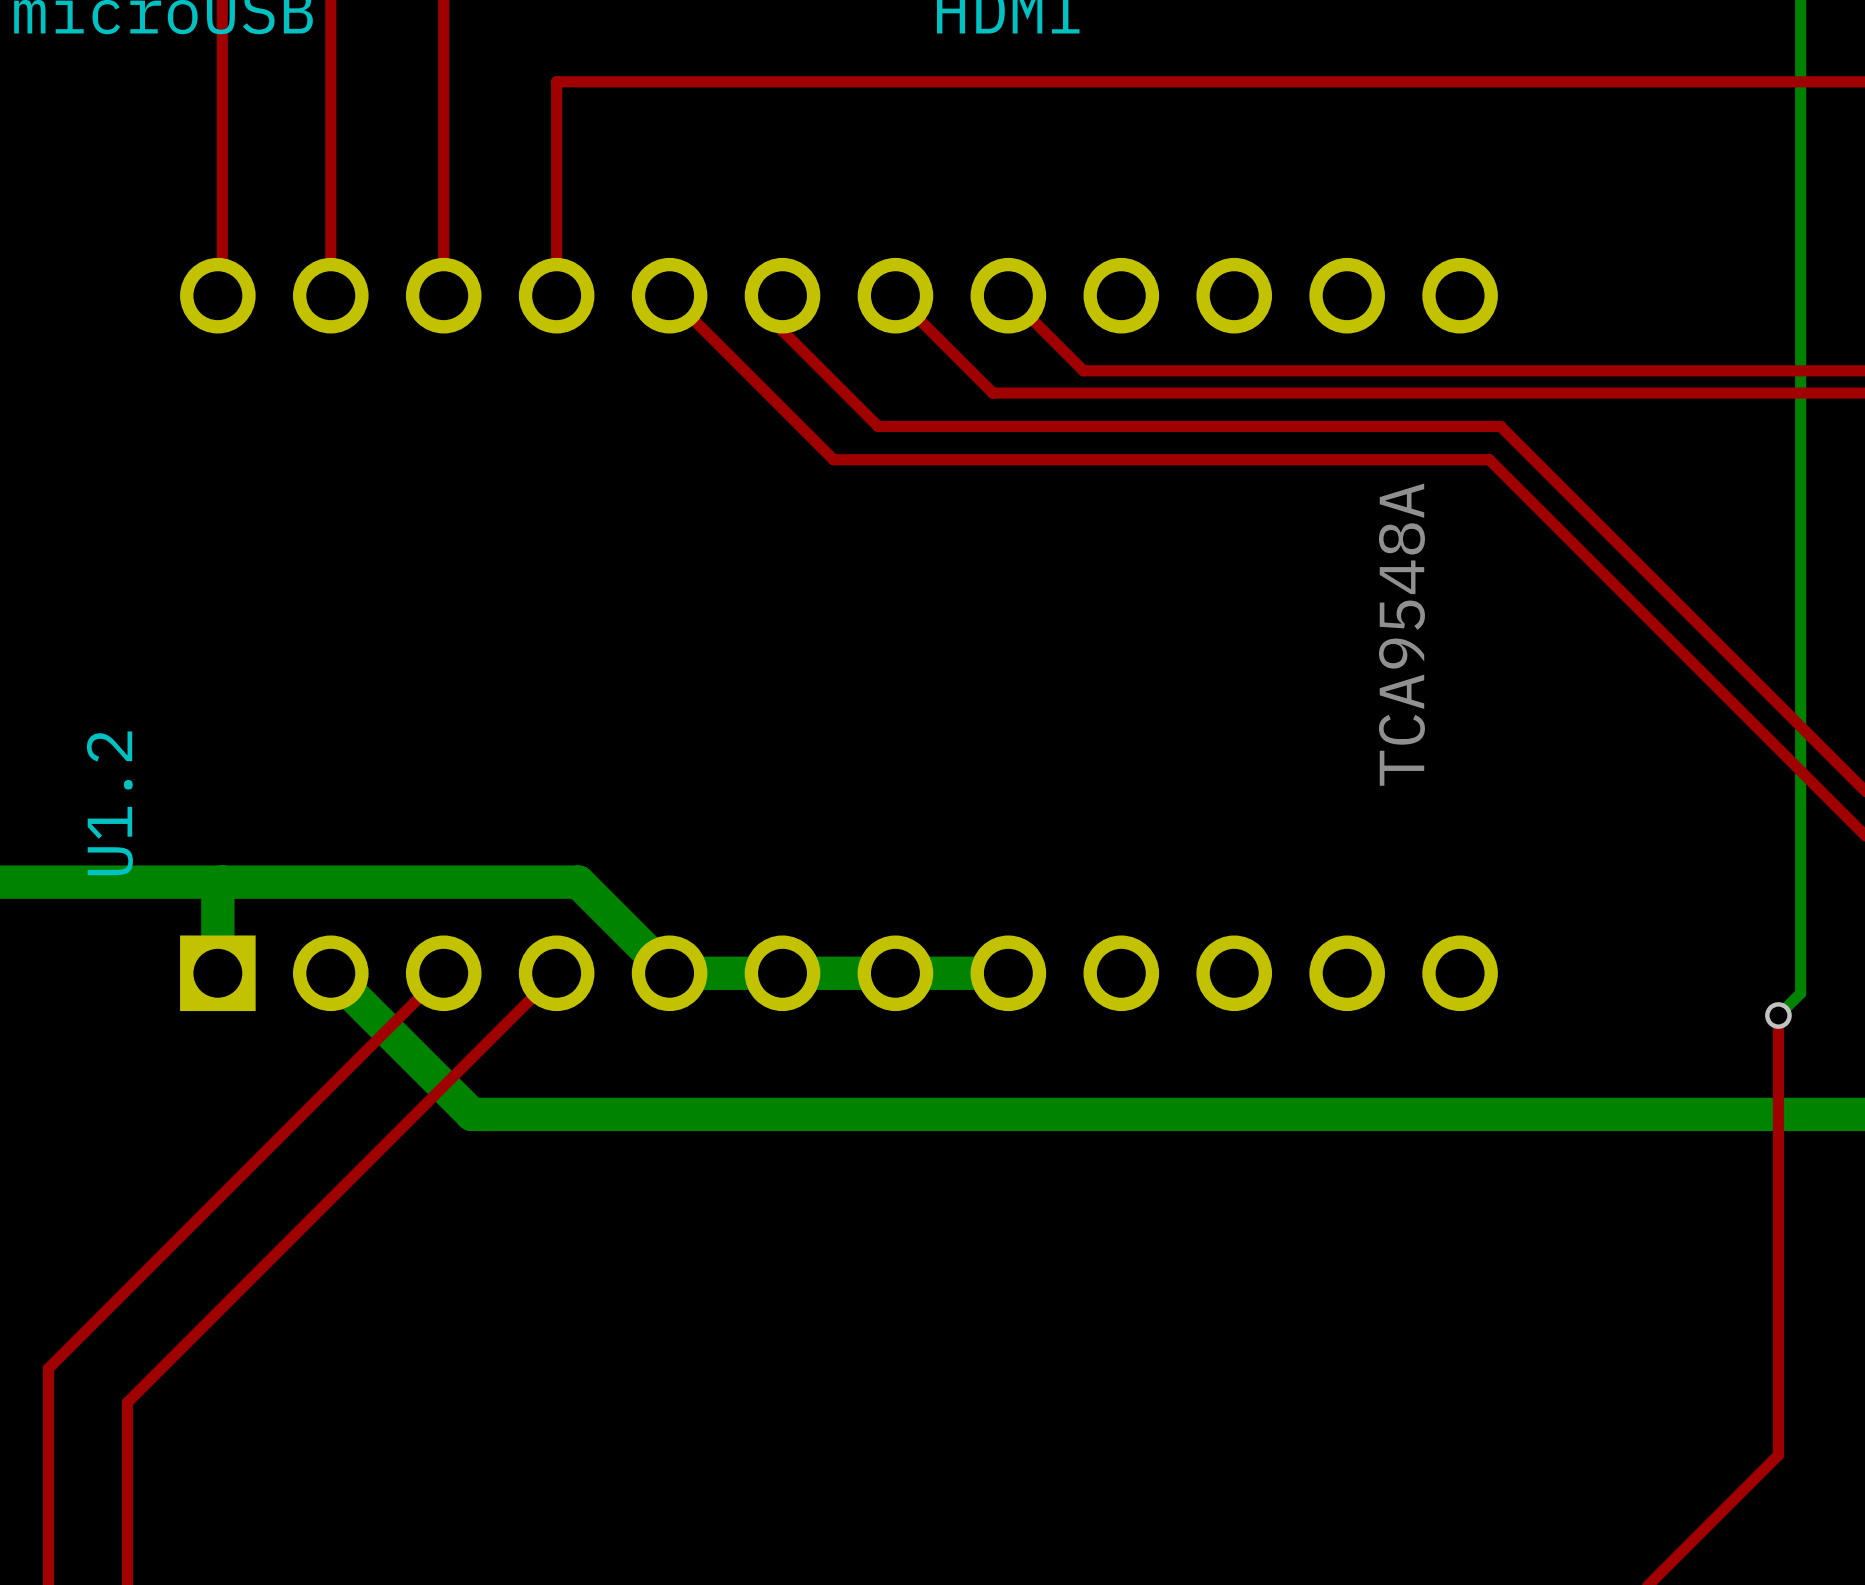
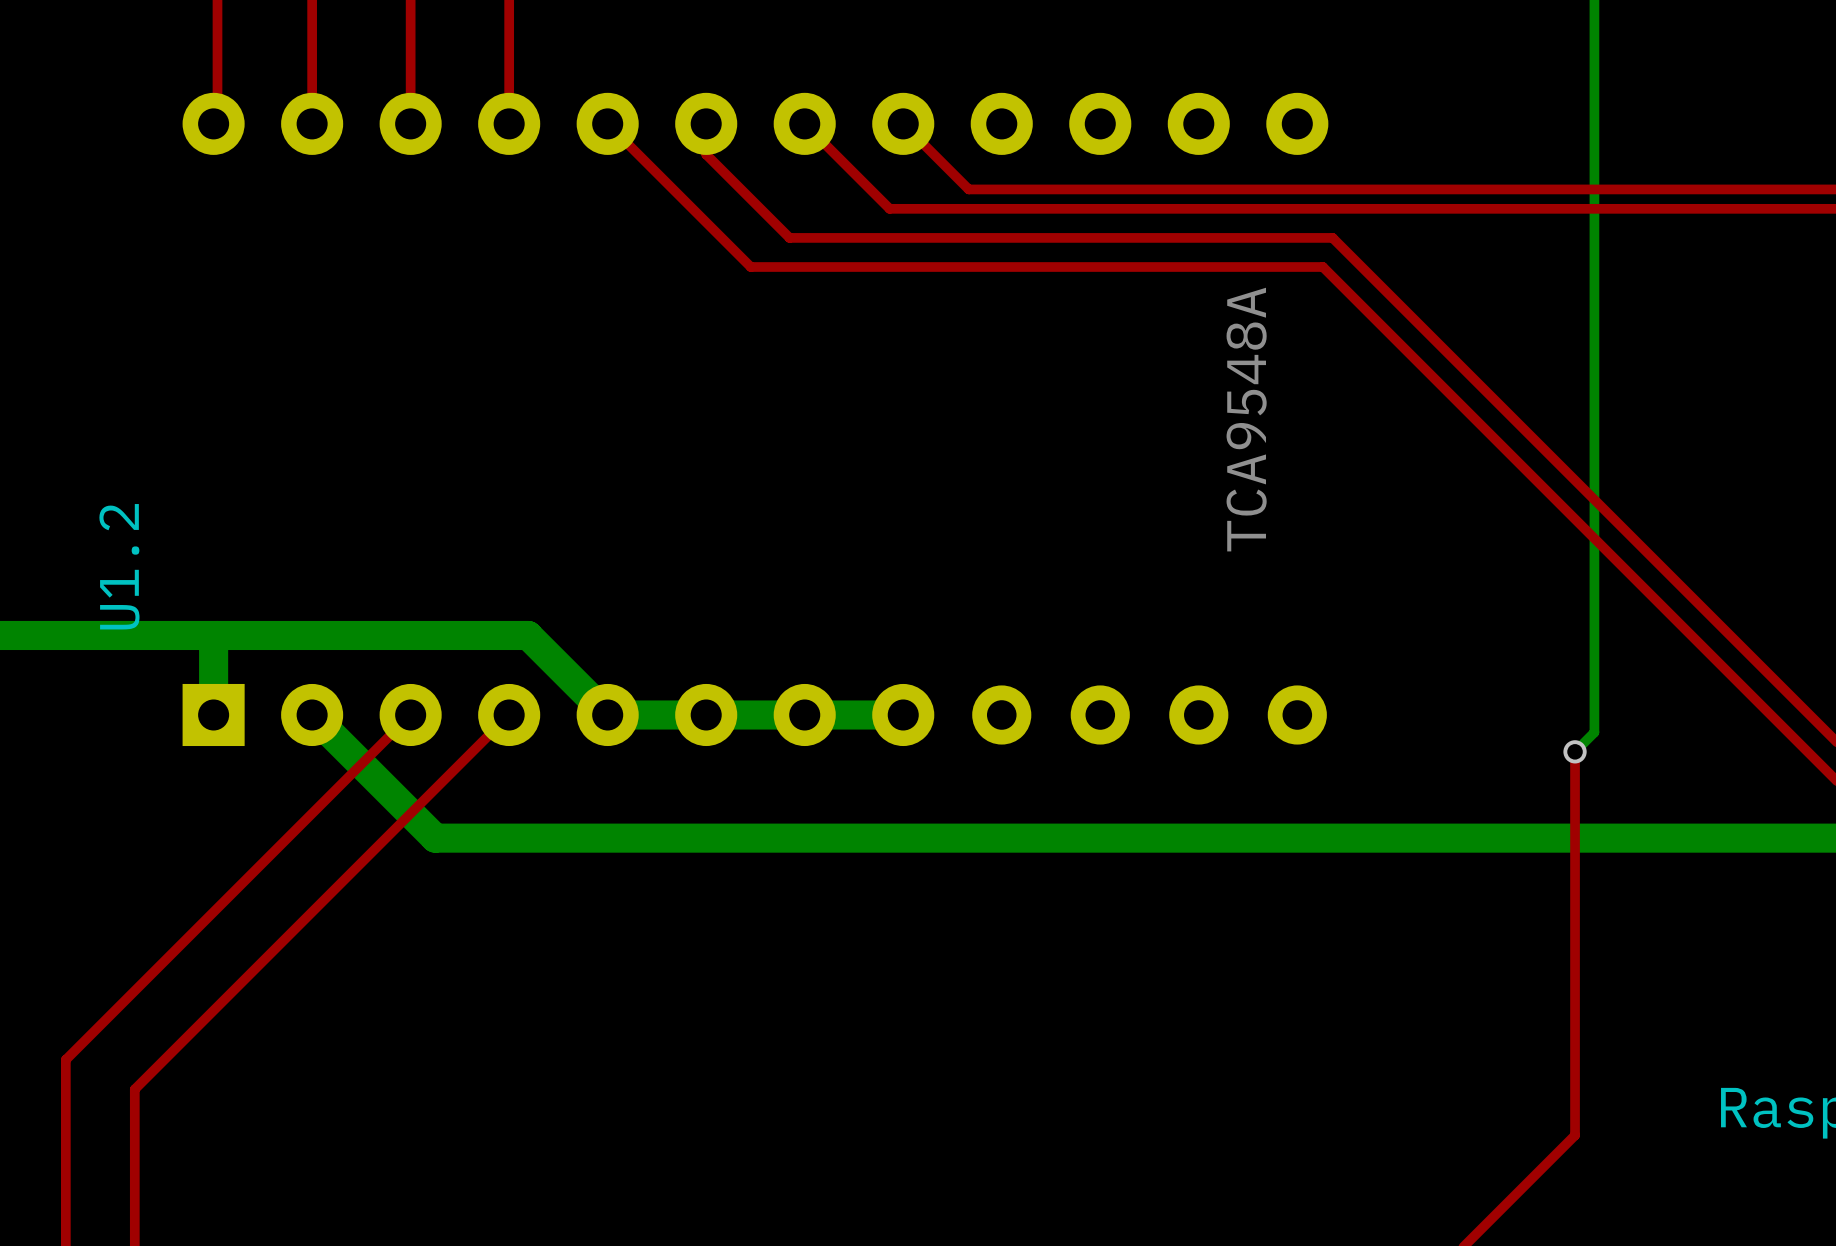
U1.2 footprint: [180, 257, 1498, 1012] -> [182, 92, 1329, 747]

